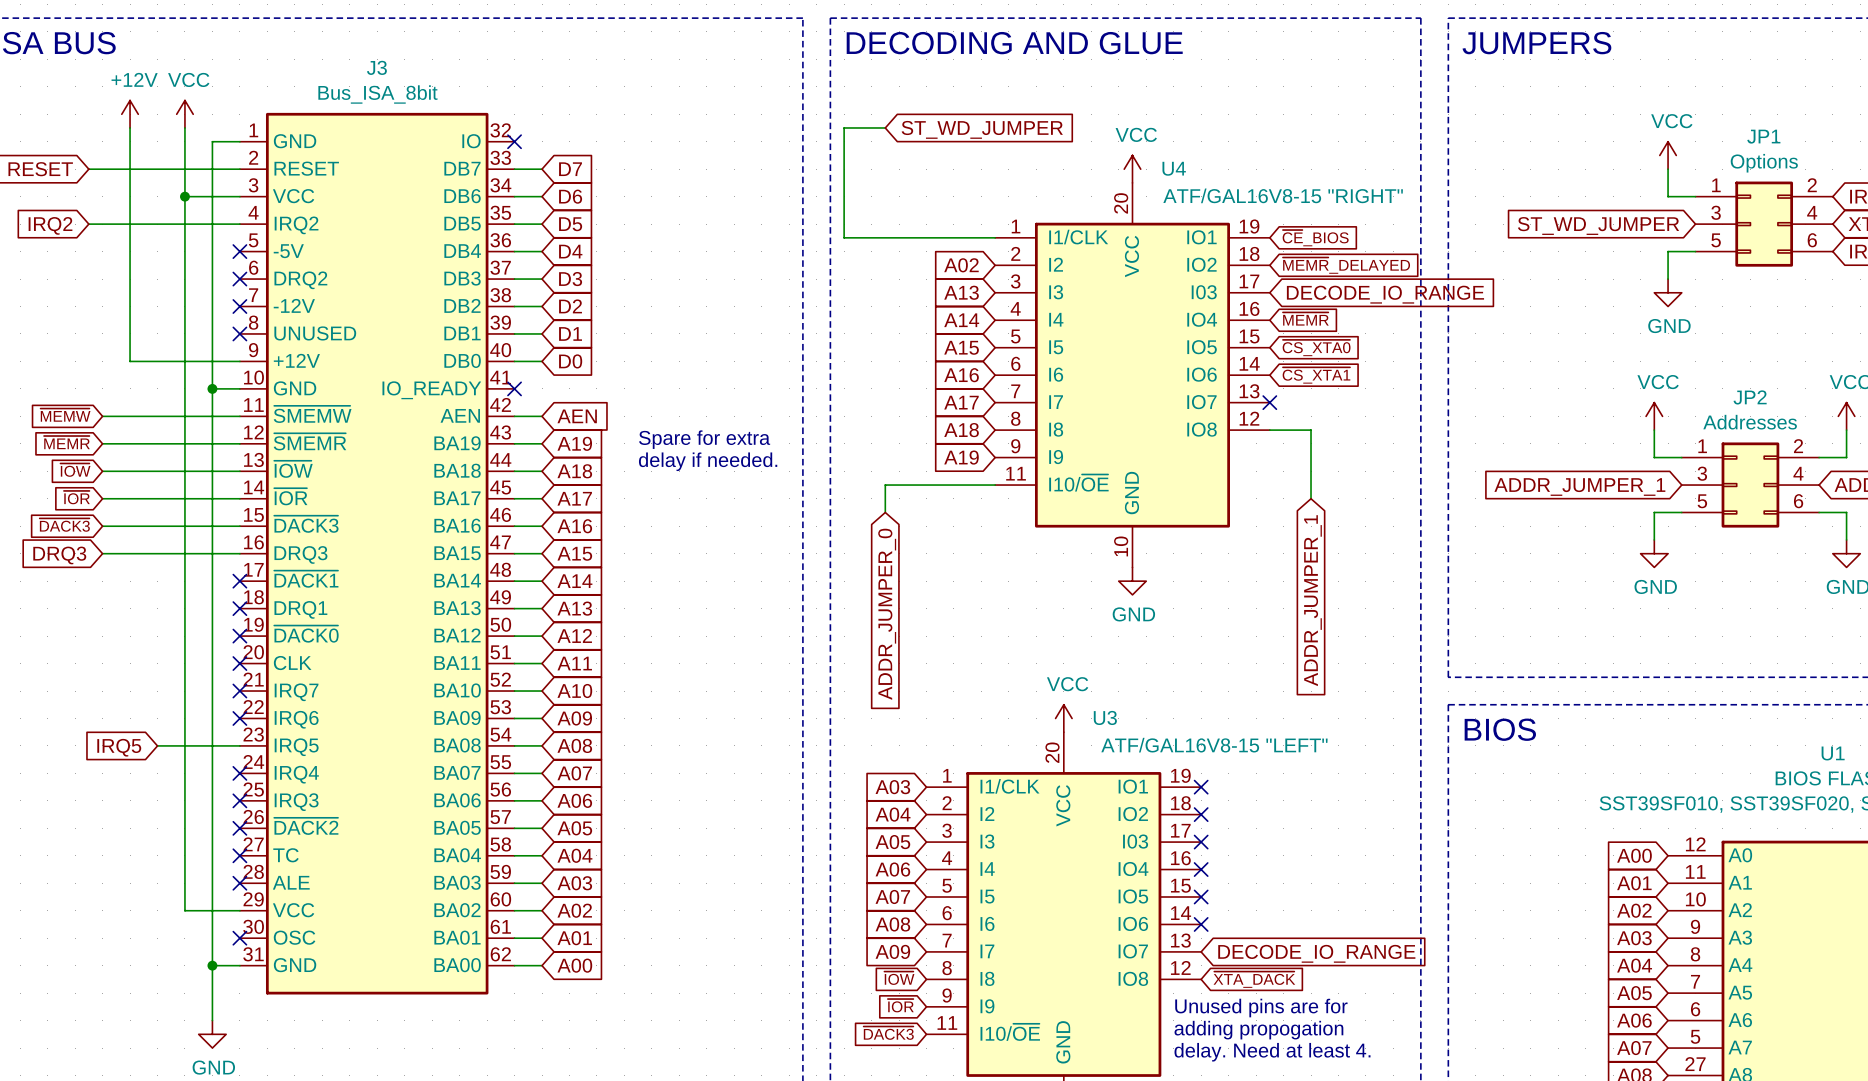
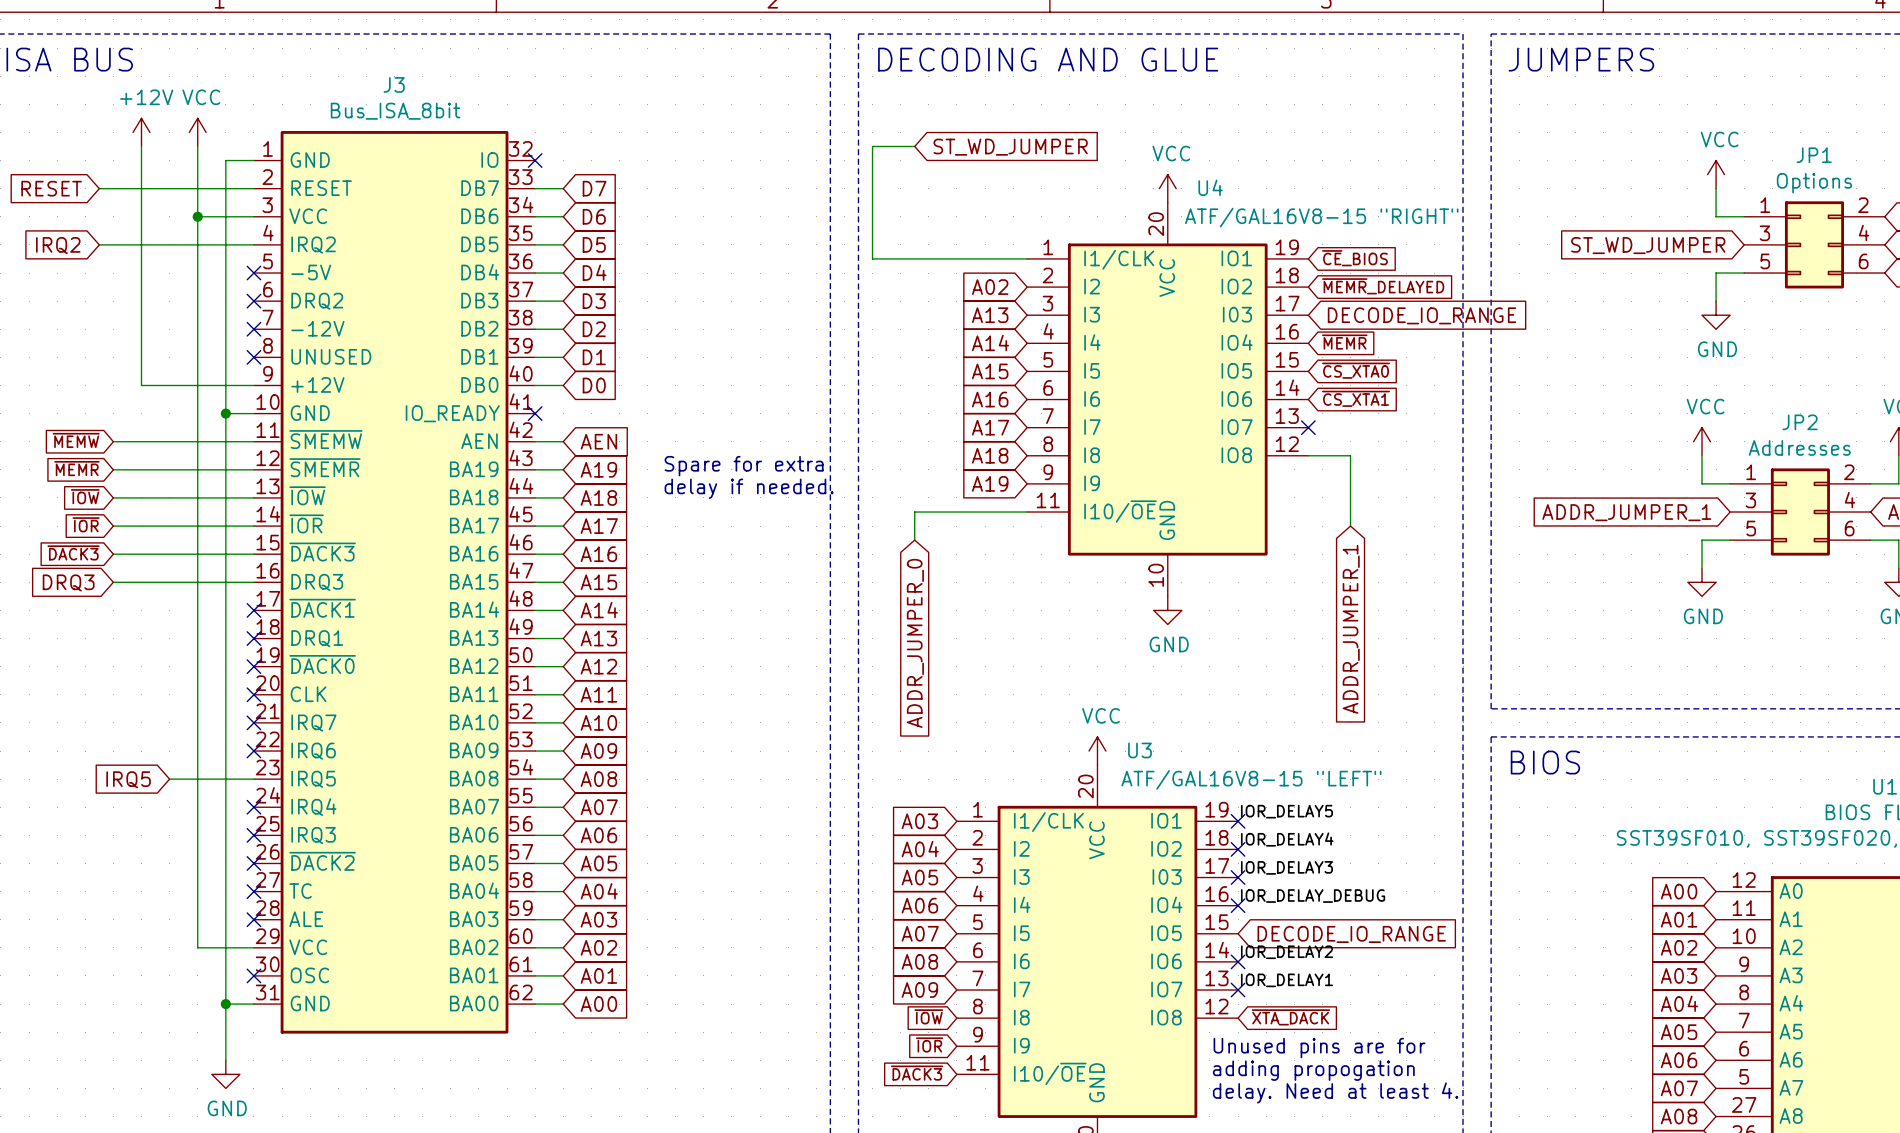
label: none -> IOR_DELAY5 (1286, 811)
label: none -> IOR_DELAY4 (1287, 839)
label: none -> IOR_DELAY3 (1286, 867)
label: none -> IOR_DELAY_DEBUG (1313, 896)
no-connect mark position: (1201, 896) -> (1238, 990)
label: none -> IOR_DELAY2 (1286, 952)
label: none -> IOR_DELAY1 (1286, 980)
global label position: DECODE_IO_RANGE (1316, 953) -> DECODE_IO_RANGE (1351, 934)

